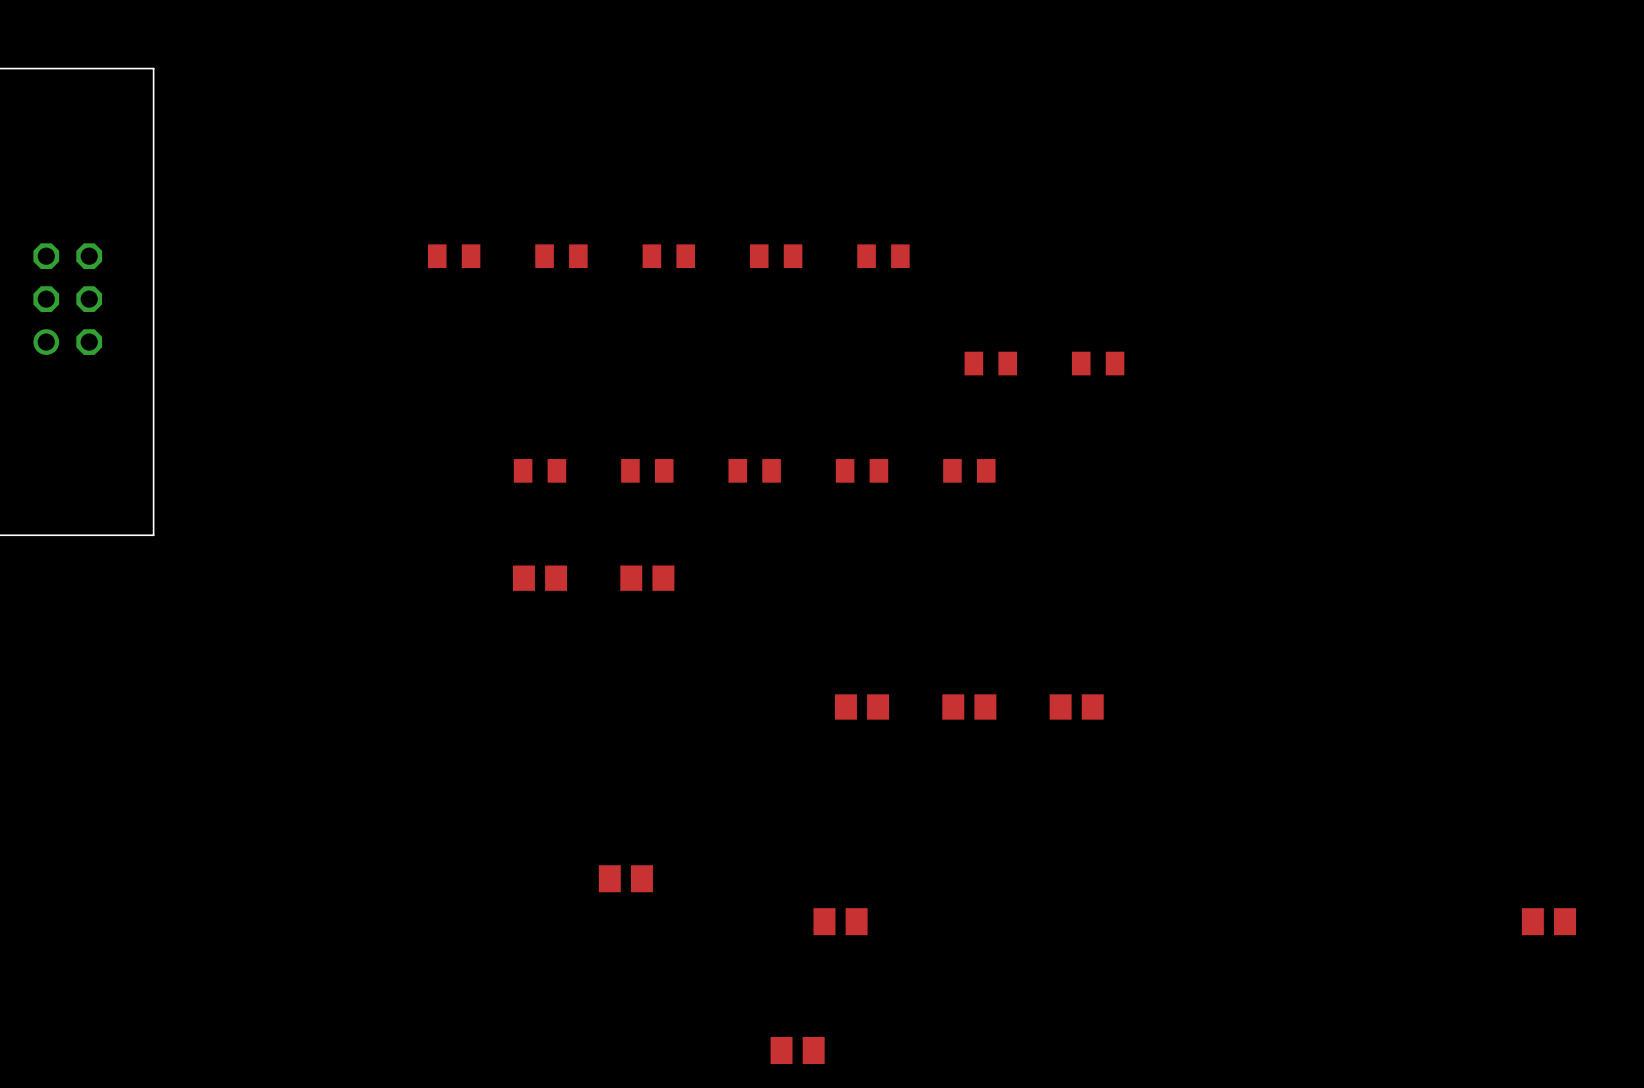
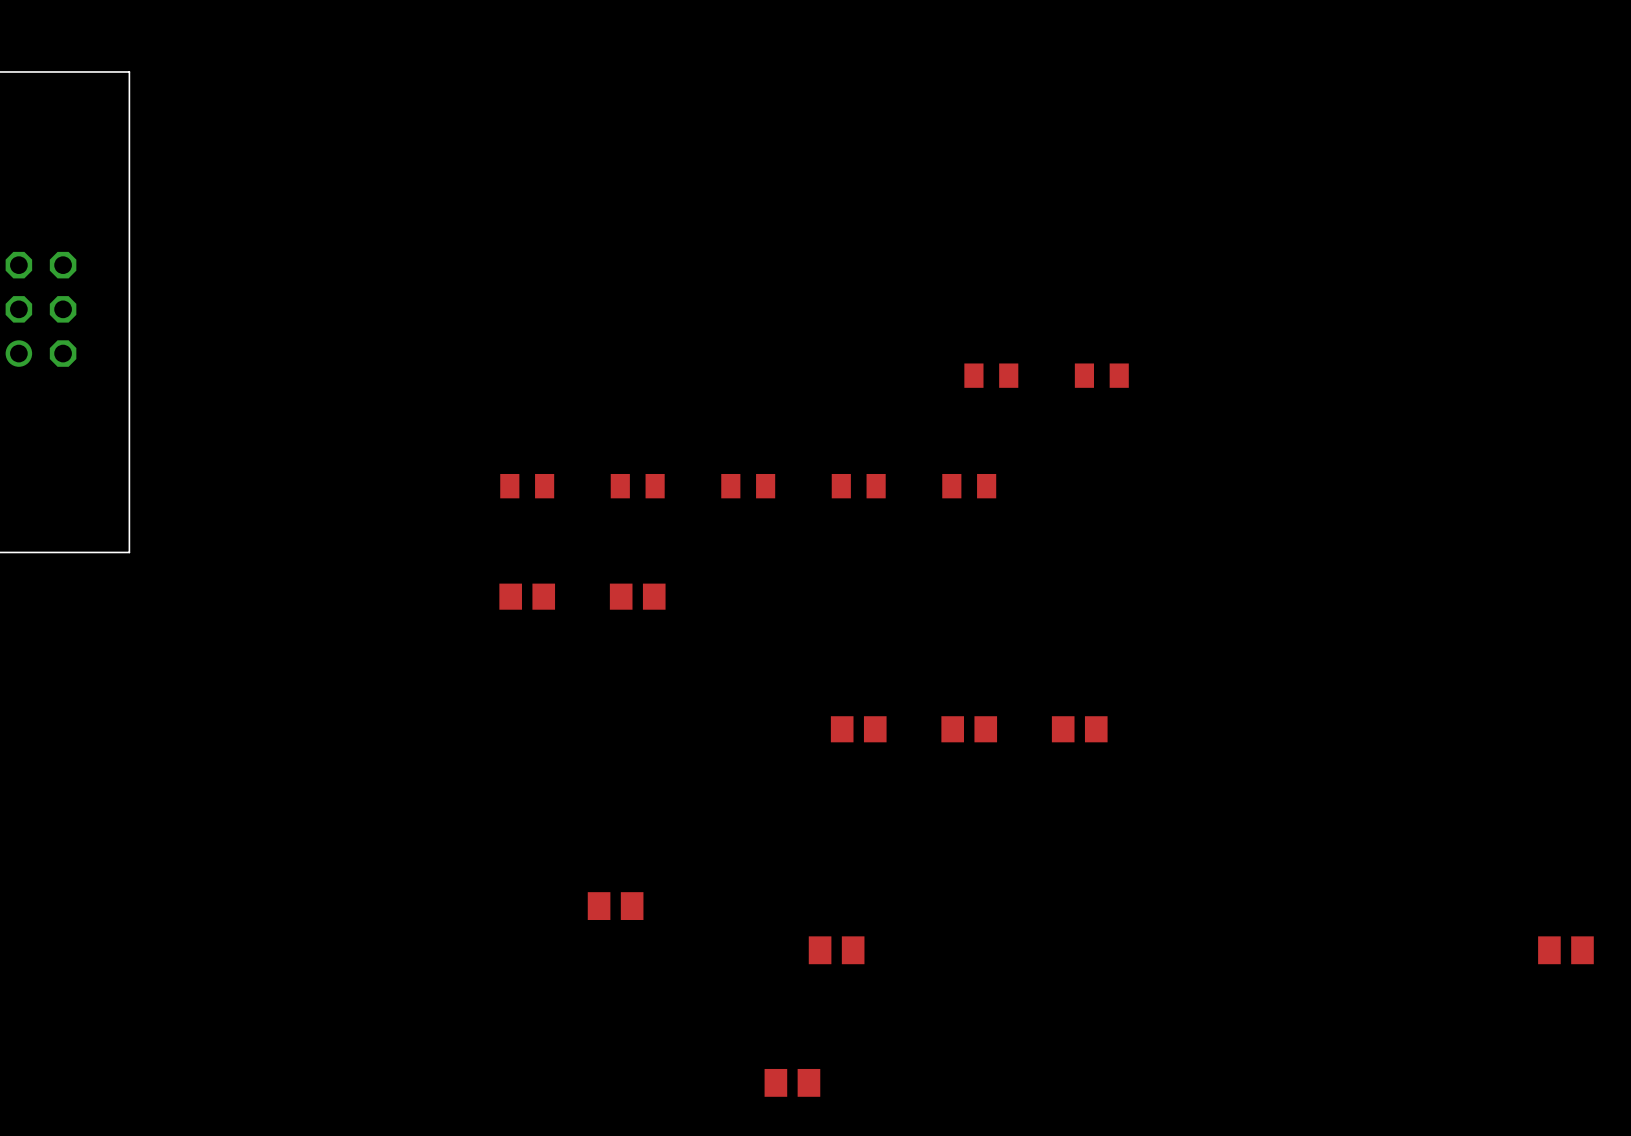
part: (454, 256) -> none
part: (561, 256) -> none
part: (668, 256) -> none
part: (776, 256) -> none
part: (883, 256) -> none

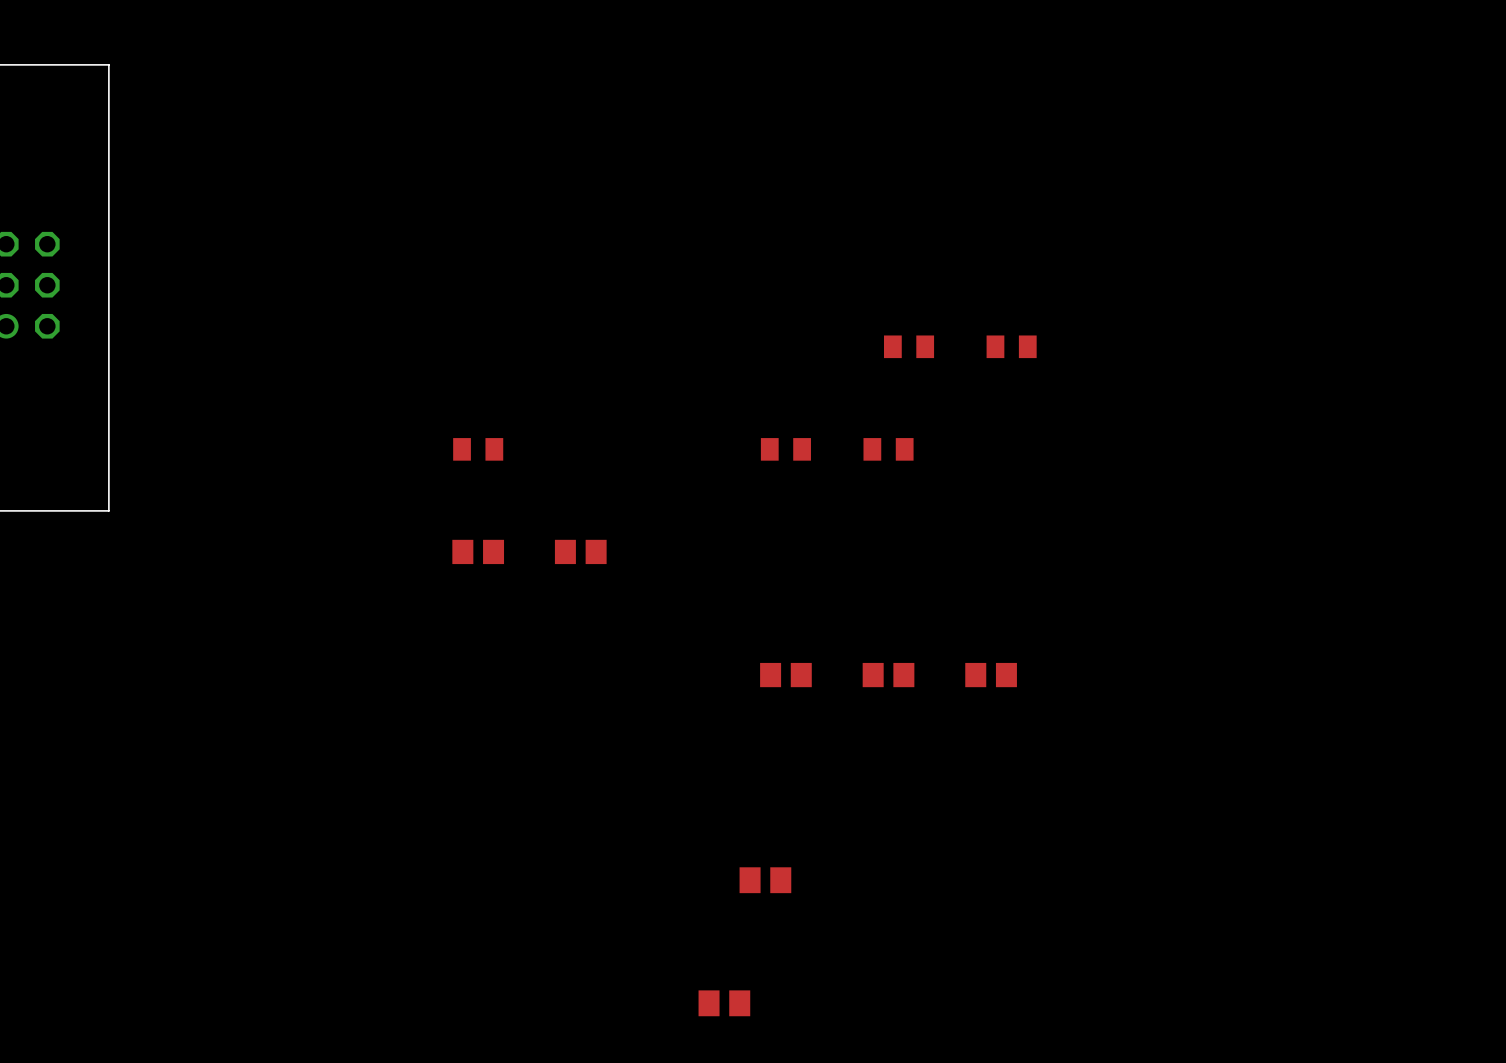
part: (637, 486) -> none
part: (748, 486) -> none
part: (615, 906) -> none
part: (1565, 950) -> none

